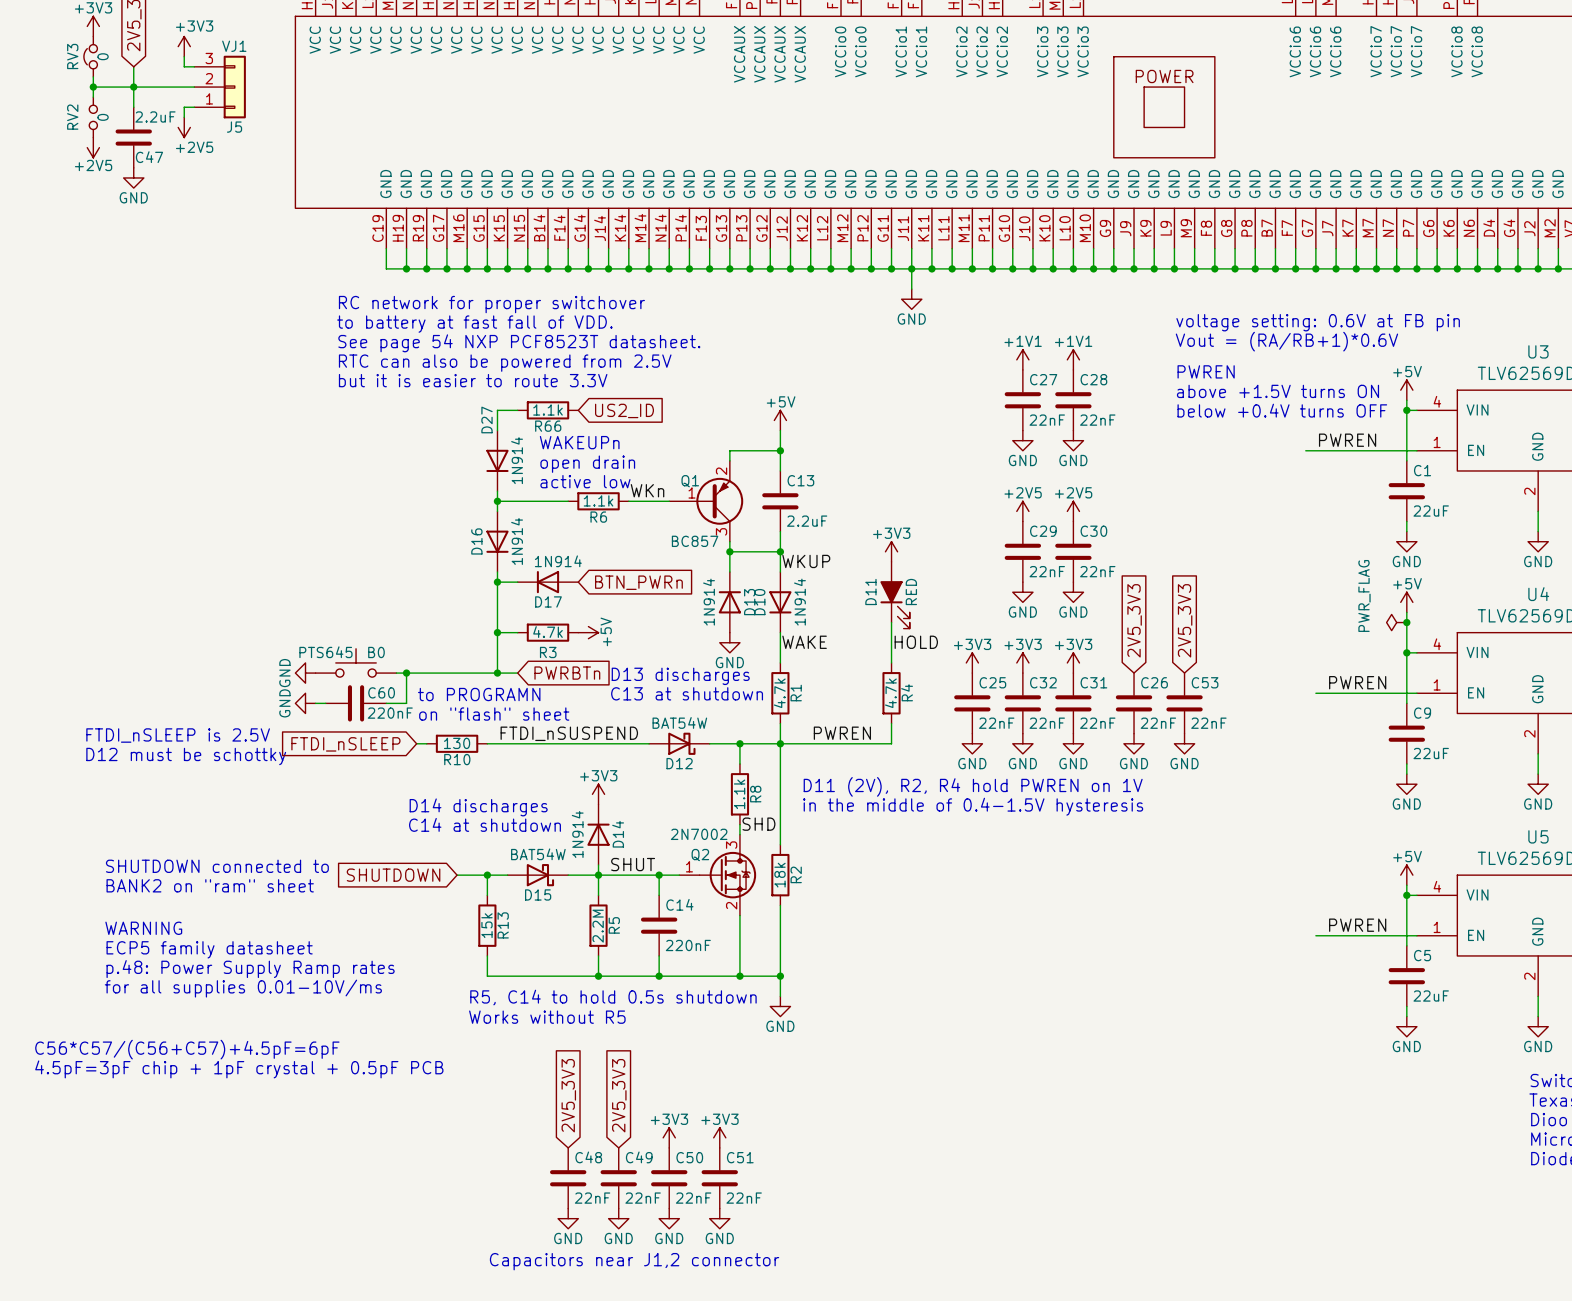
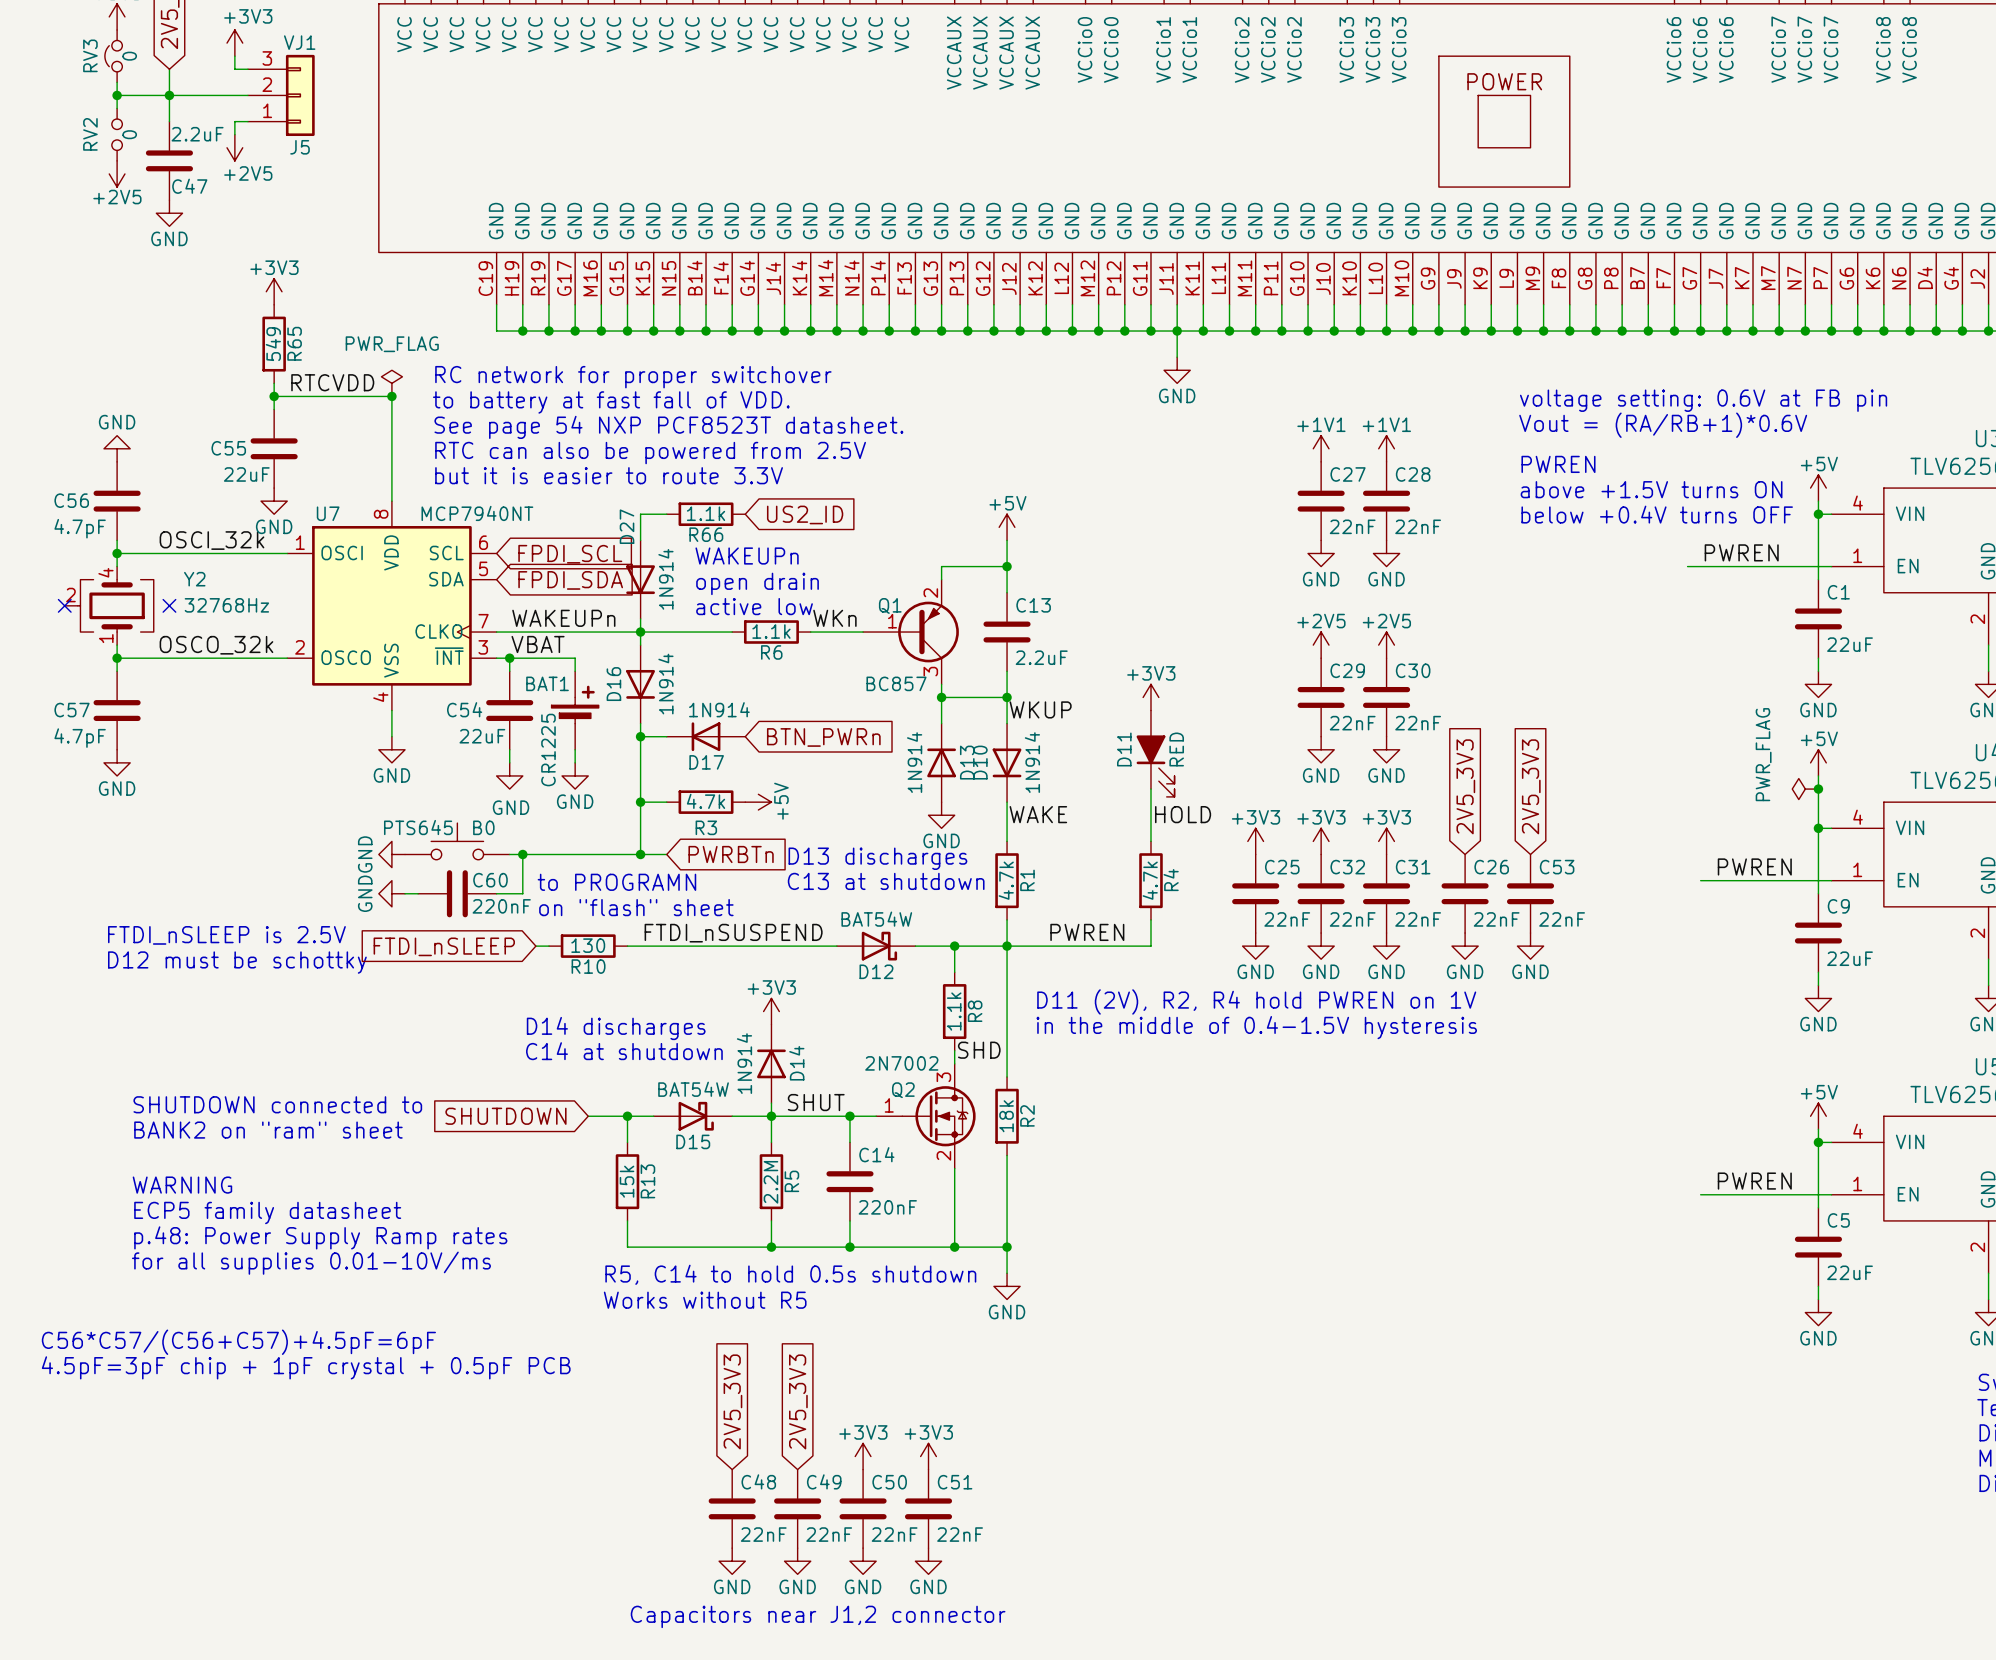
power symbol: none -> +3V3 (274, 291)
R65: none -> 549 (274, 344)
label: none -> RTCVDD (332, 382)
wire: none -> (274, 383) (274, 409)
power symbol: none -> PWR_FLAG (391, 383)
wire: none -> (274, 396) (391, 396) (391, 501)
junction: none -> (274, 396)
junction: none -> (391, 396)
power symbol: none -> GND (117, 448)
C55: none -> 22uF (274, 448)
C56: none -> 4.7pF (117, 501)
power symbol: none -> GND (274, 501)
wire: none -> (117, 540) (117, 566)
label: none -> OSCI_32k (211, 540)
wire: none -> (117, 553) (287, 553)
junction: none -> (117, 553)
global label: none -> FPDI_SCL (570, 554)
global label: none -> FPDI_SDA (570, 580)
no-connect mark: none -> (64, 605)
Y2: none -> 32768Hz (109, 605)
no-connect mark: none -> (169, 605)
U7: none -> MCP7940NT (391, 605)
label: none -> WAKEUPn (563, 618)
wire: none -> (496, 632) (640, 632)
label: none -> VBAT (538, 644)
wire: none -> (117, 645) (117, 671)
label: none -> OSCO_32k (216, 645)
wire: none -> (117, 658) (287, 658)
junction: none -> (117, 658)
wire: none -> (496, 658) (575, 658) (575, 671)
wire: none -> (509, 658) (509, 671)
junction: none -> (509, 658)
C57: none -> 4.7pF (117, 710)
wire: none -> (391, 710) (391, 736)
C54: none -> 22uF (509, 710)
BAT1: none -> CR1225 (575, 710)
power symbol: none -> GND (391, 749)
wire: none -> (509, 749) (509, 762)
wire: none -> (575, 749) (575, 762)
power symbol: none -> GND (117, 762)
power symbol: none -> GND (509, 775)
power symbol: none -> GND (575, 775)

